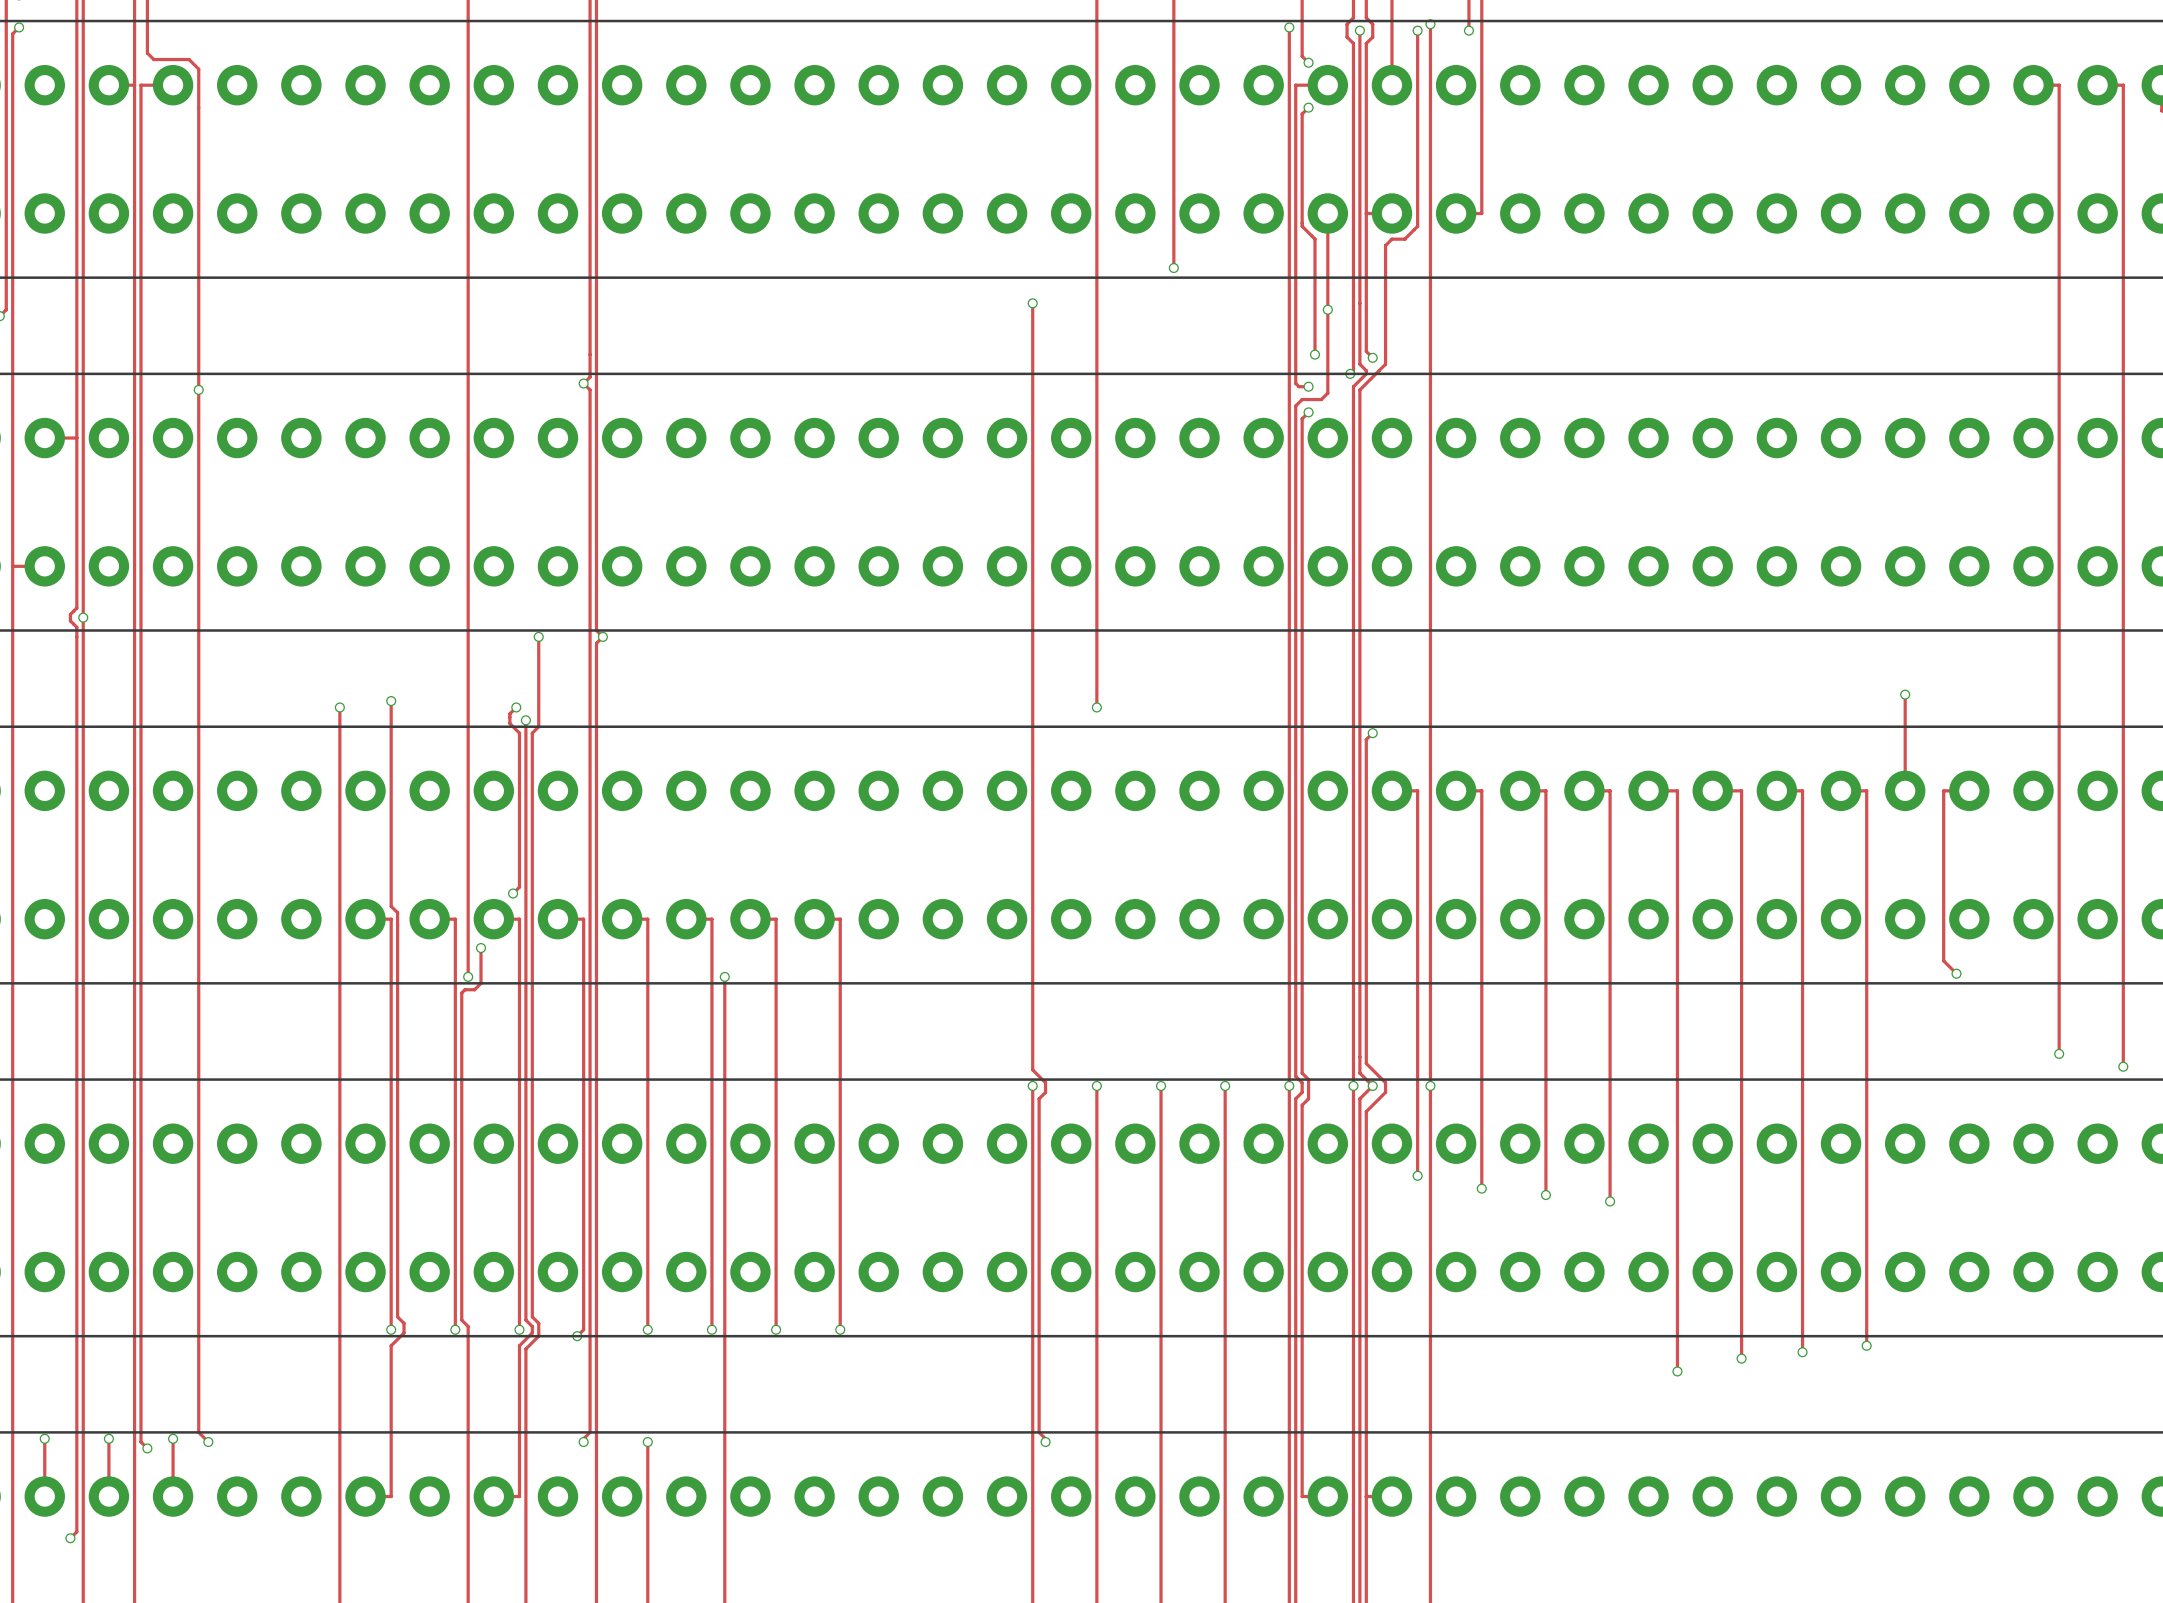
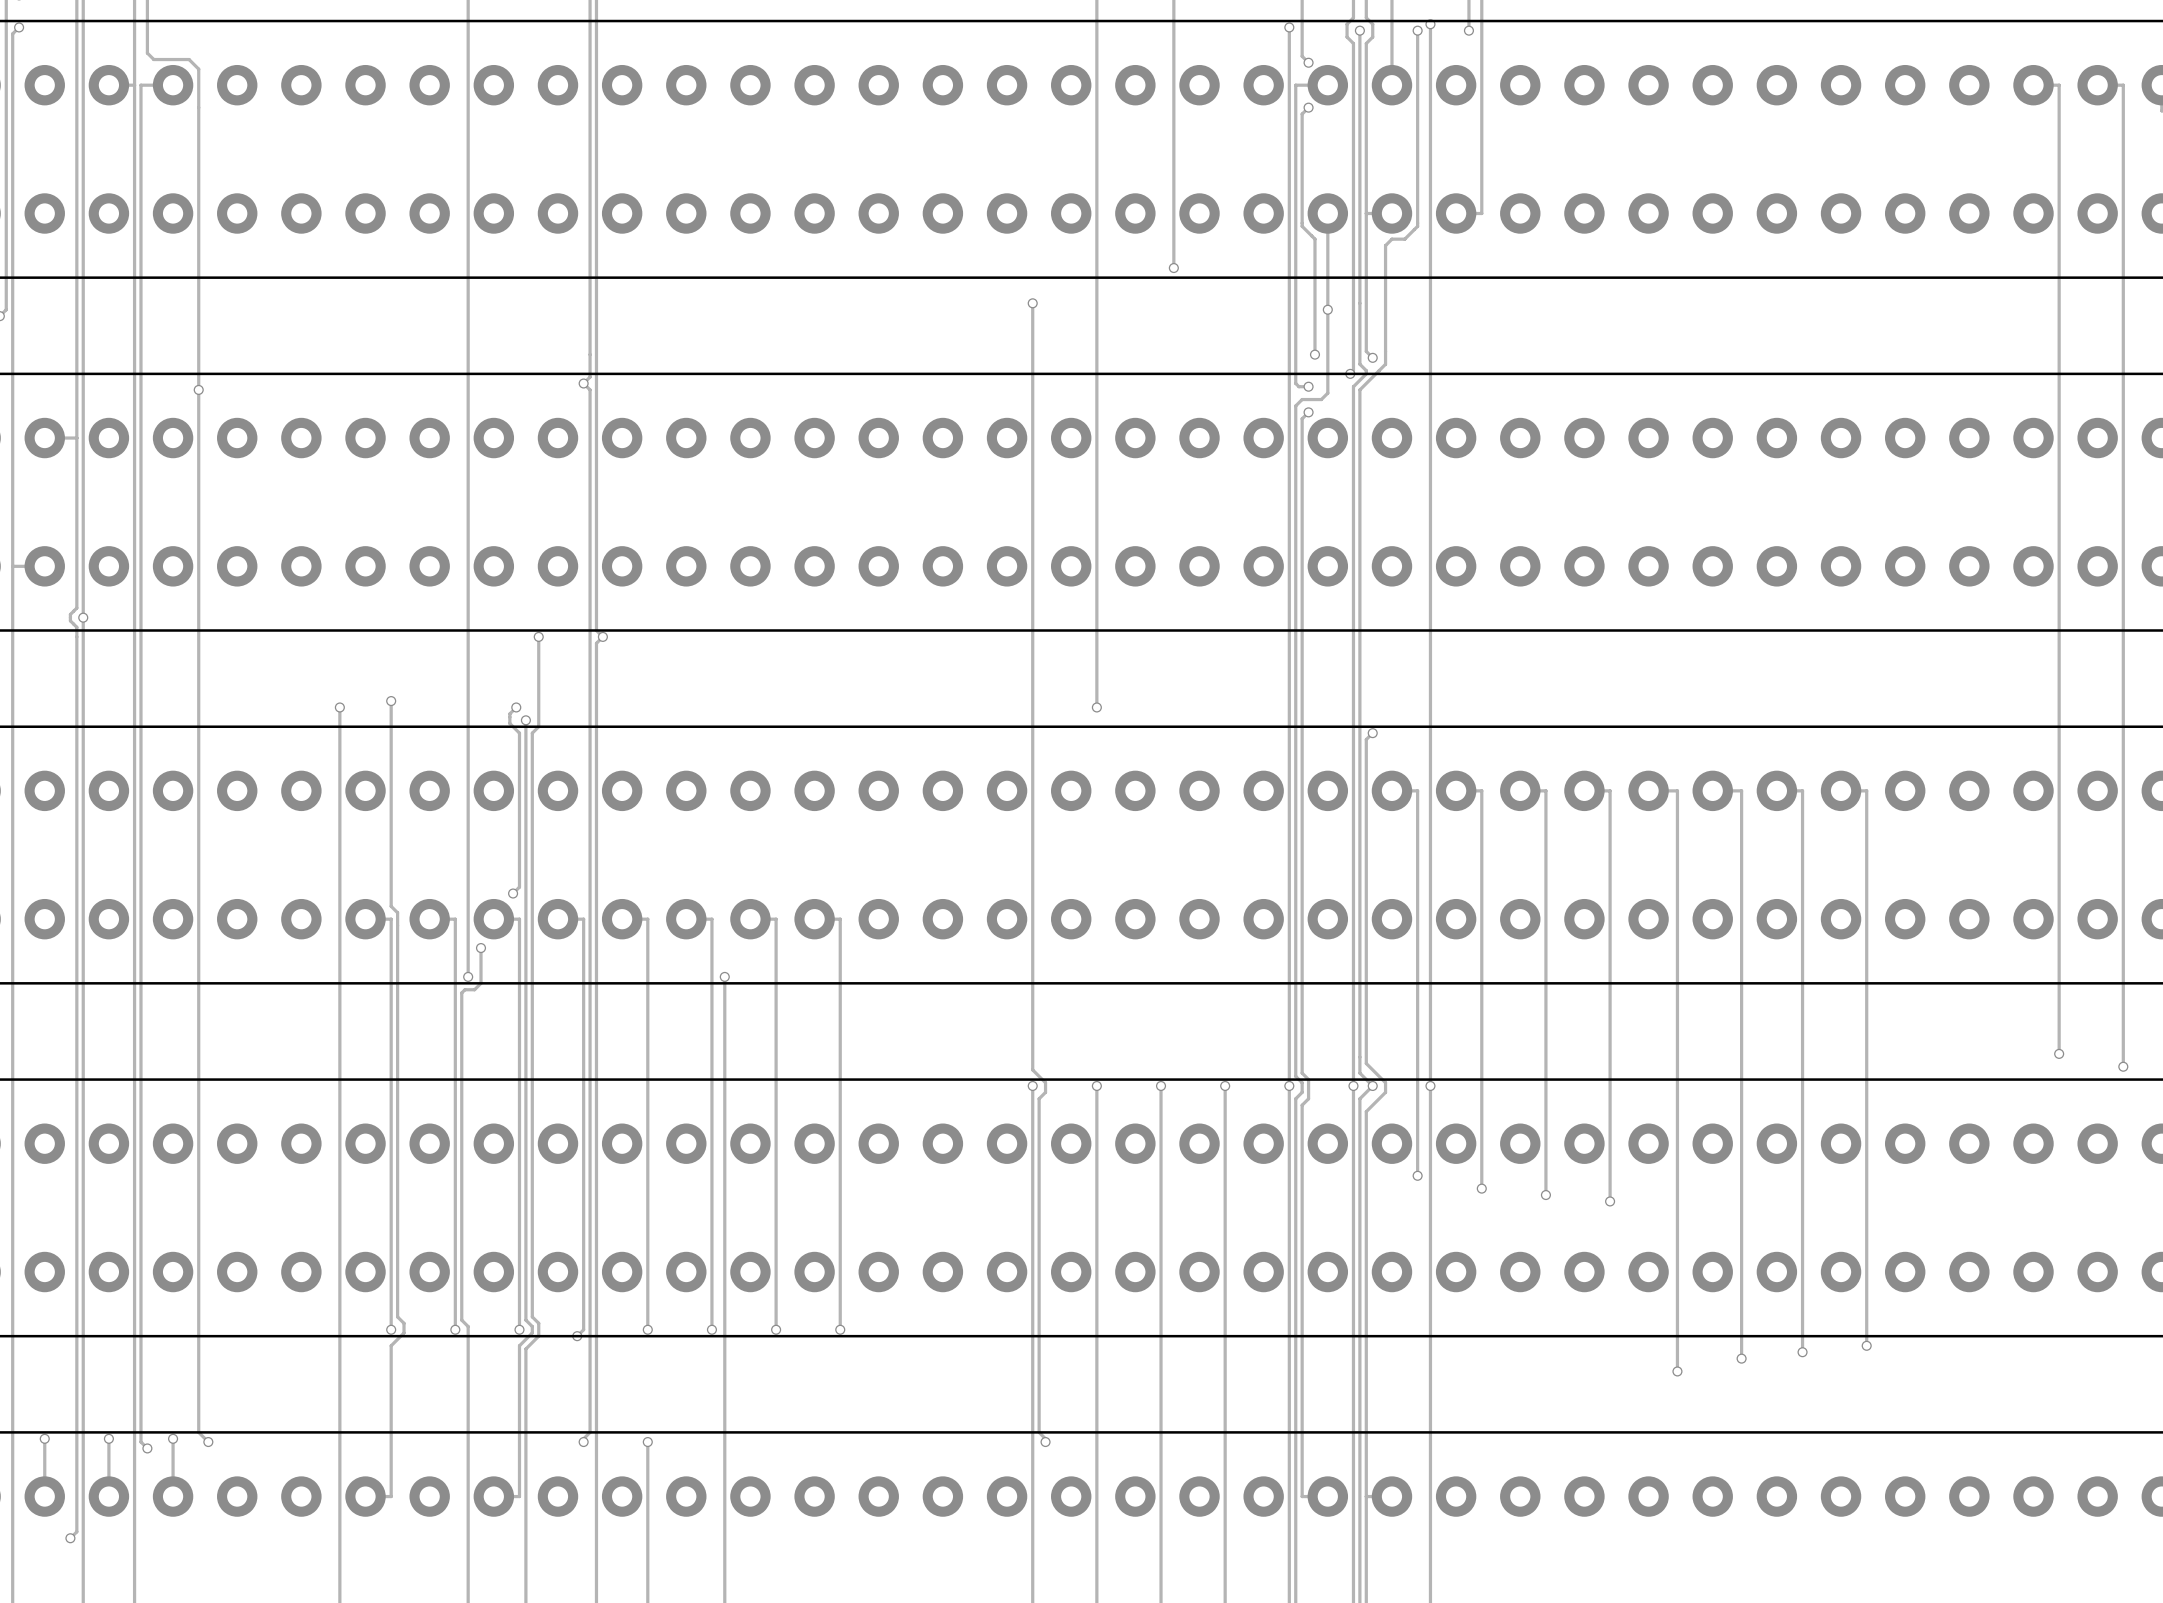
track: (1905, 694) (1905, 790) -> none
via: (1905, 694) -> none
track: (1969, 790) (1943, 790) (1943, 960) (1956, 973) -> none
via: (1956, 973) -> none

